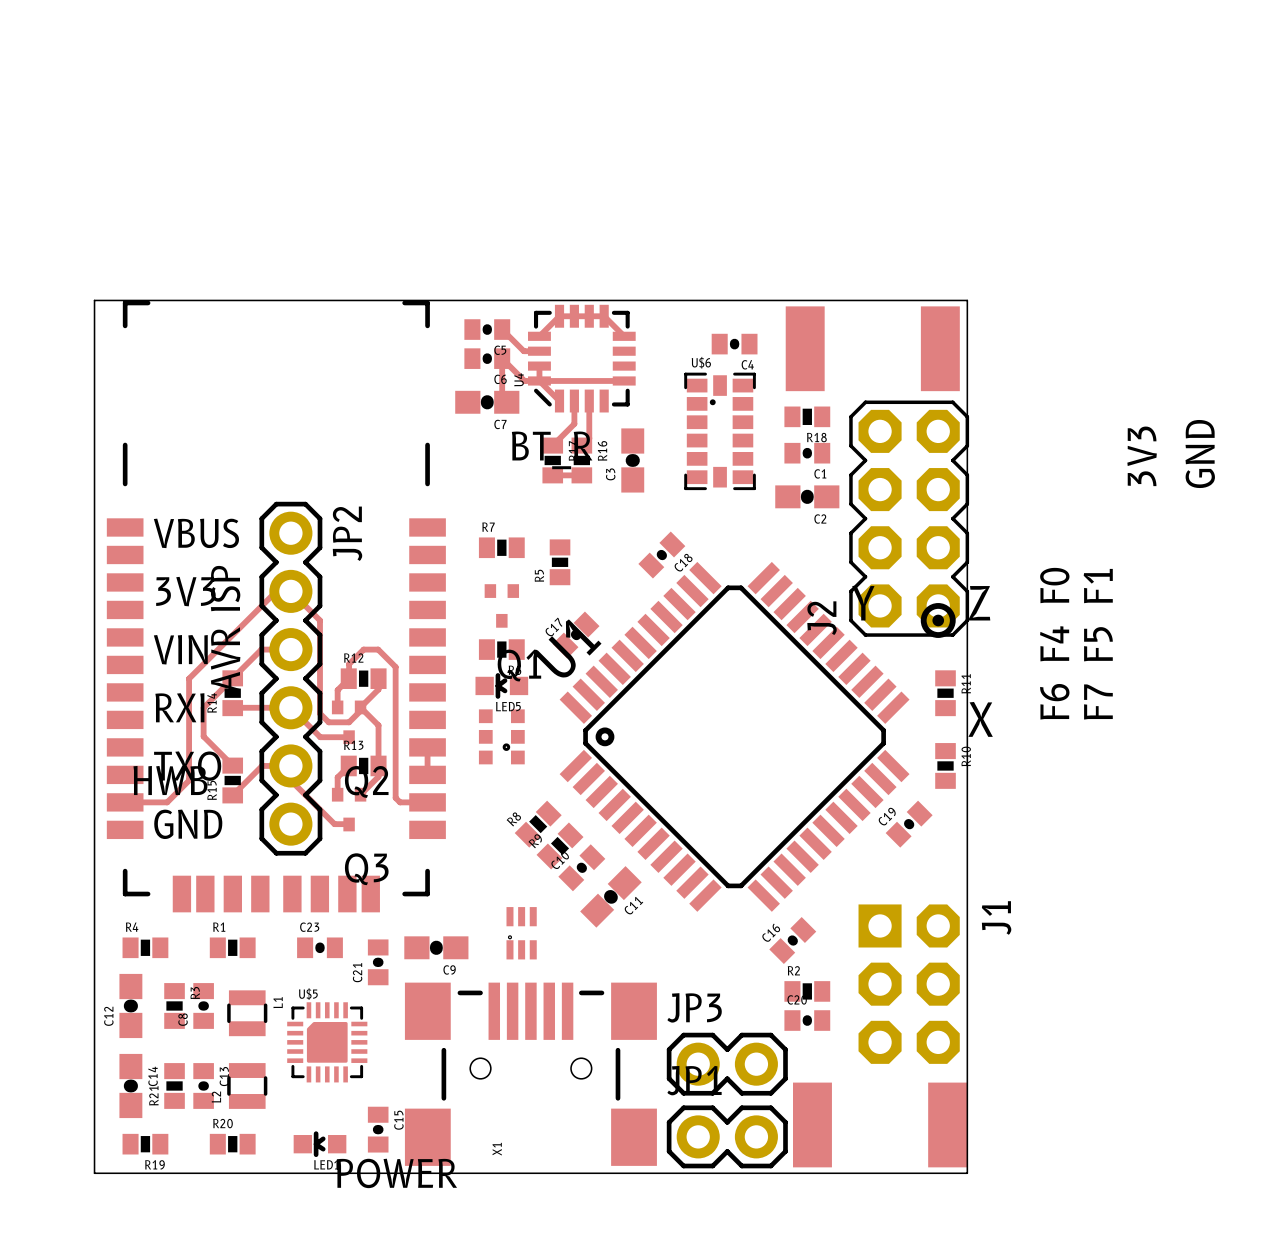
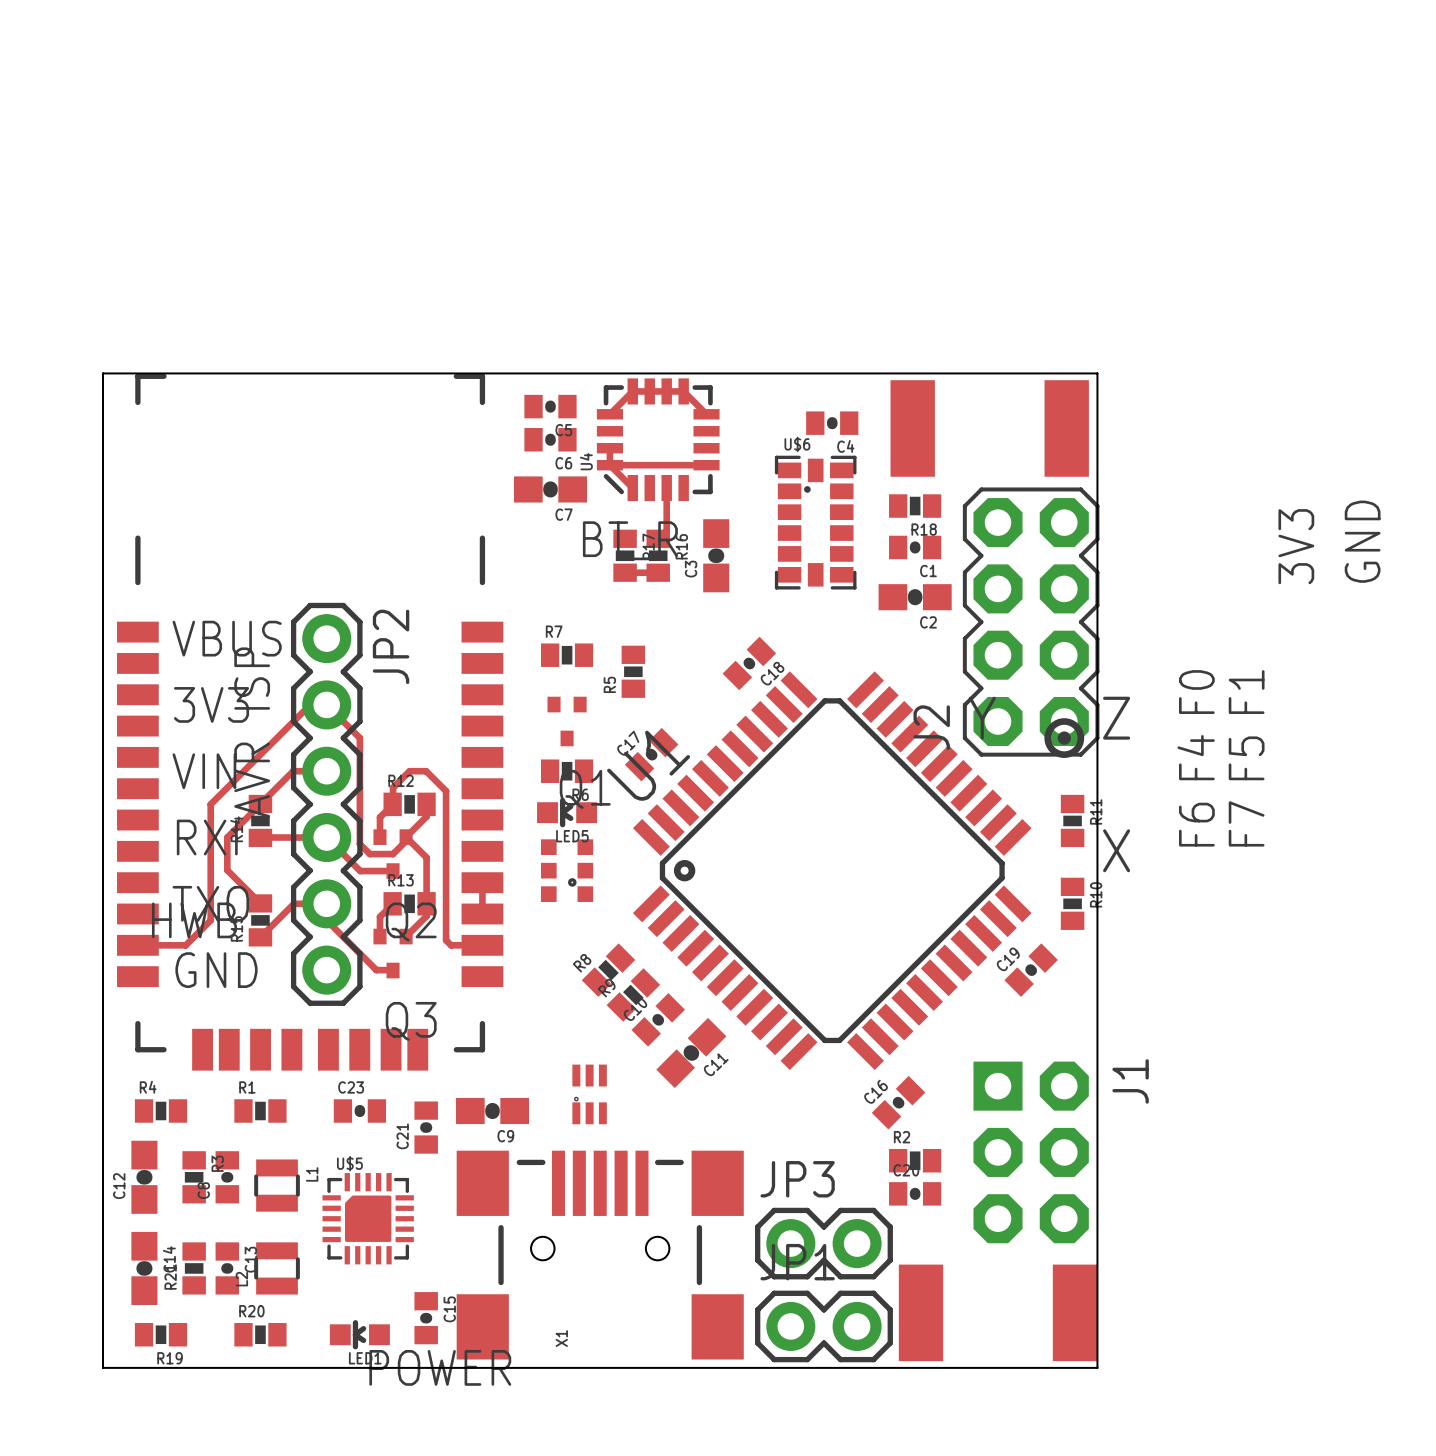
track: (502, 329) (523, 351) (539, 351) -> none
track: (539, 380) (524, 380) (502, 358) (502, 397) (506, 402) -> none
track: (574, 401) (574, 423) (552, 445) -> none

